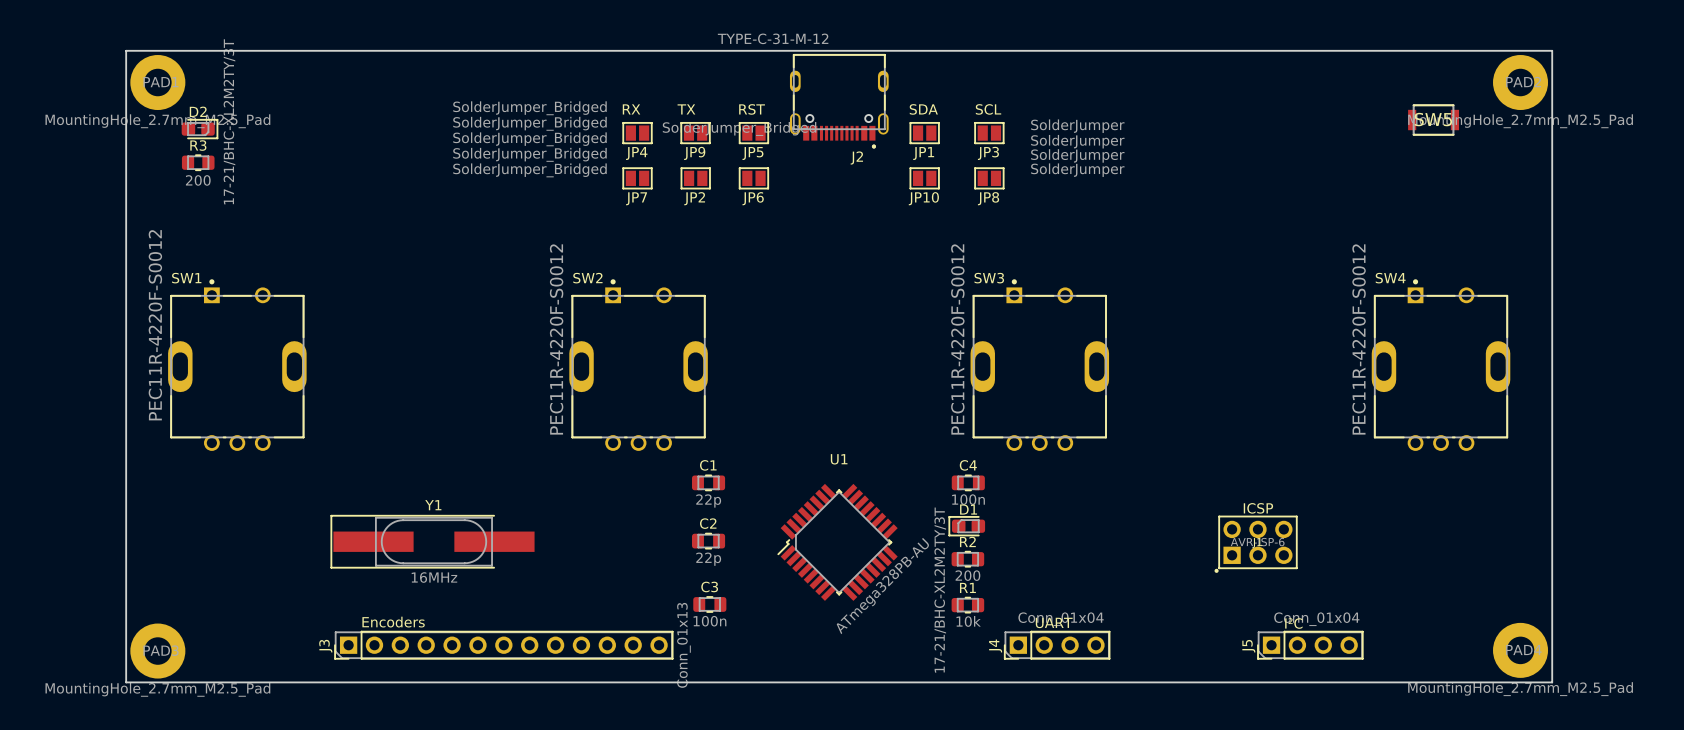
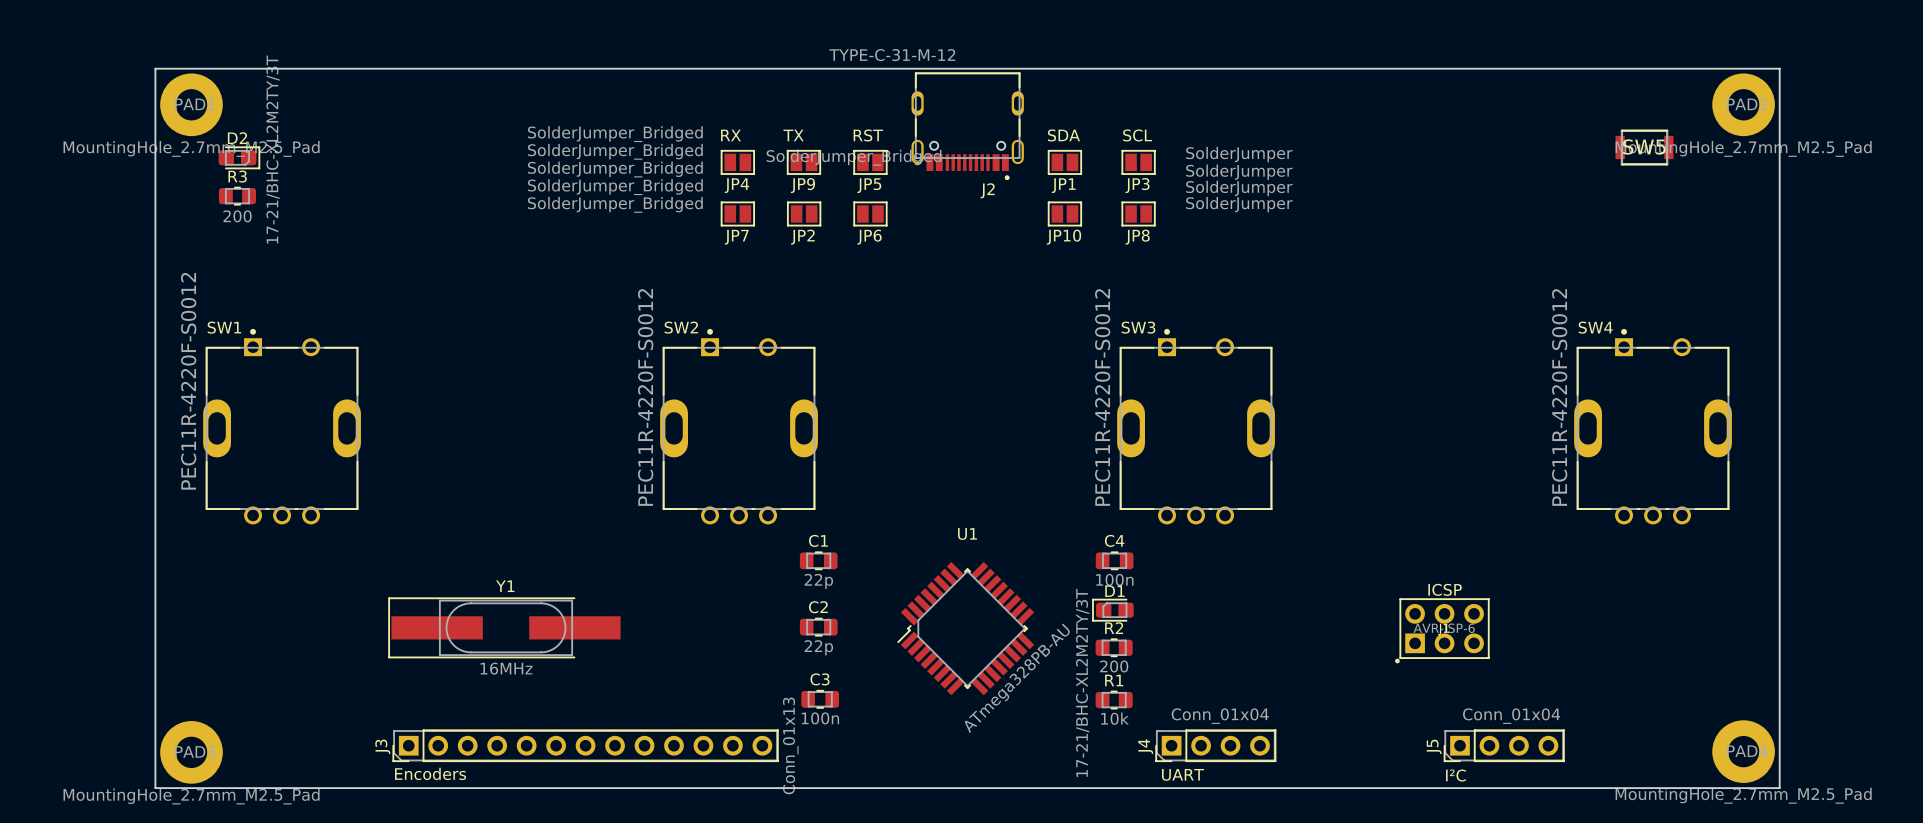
text position: Encoders (393, 622) -> Encoders (430, 773)
text position: UART (1054, 622) -> UART (1182, 774)
text position: I²C (1293, 623) -> I²C (1455, 775)

